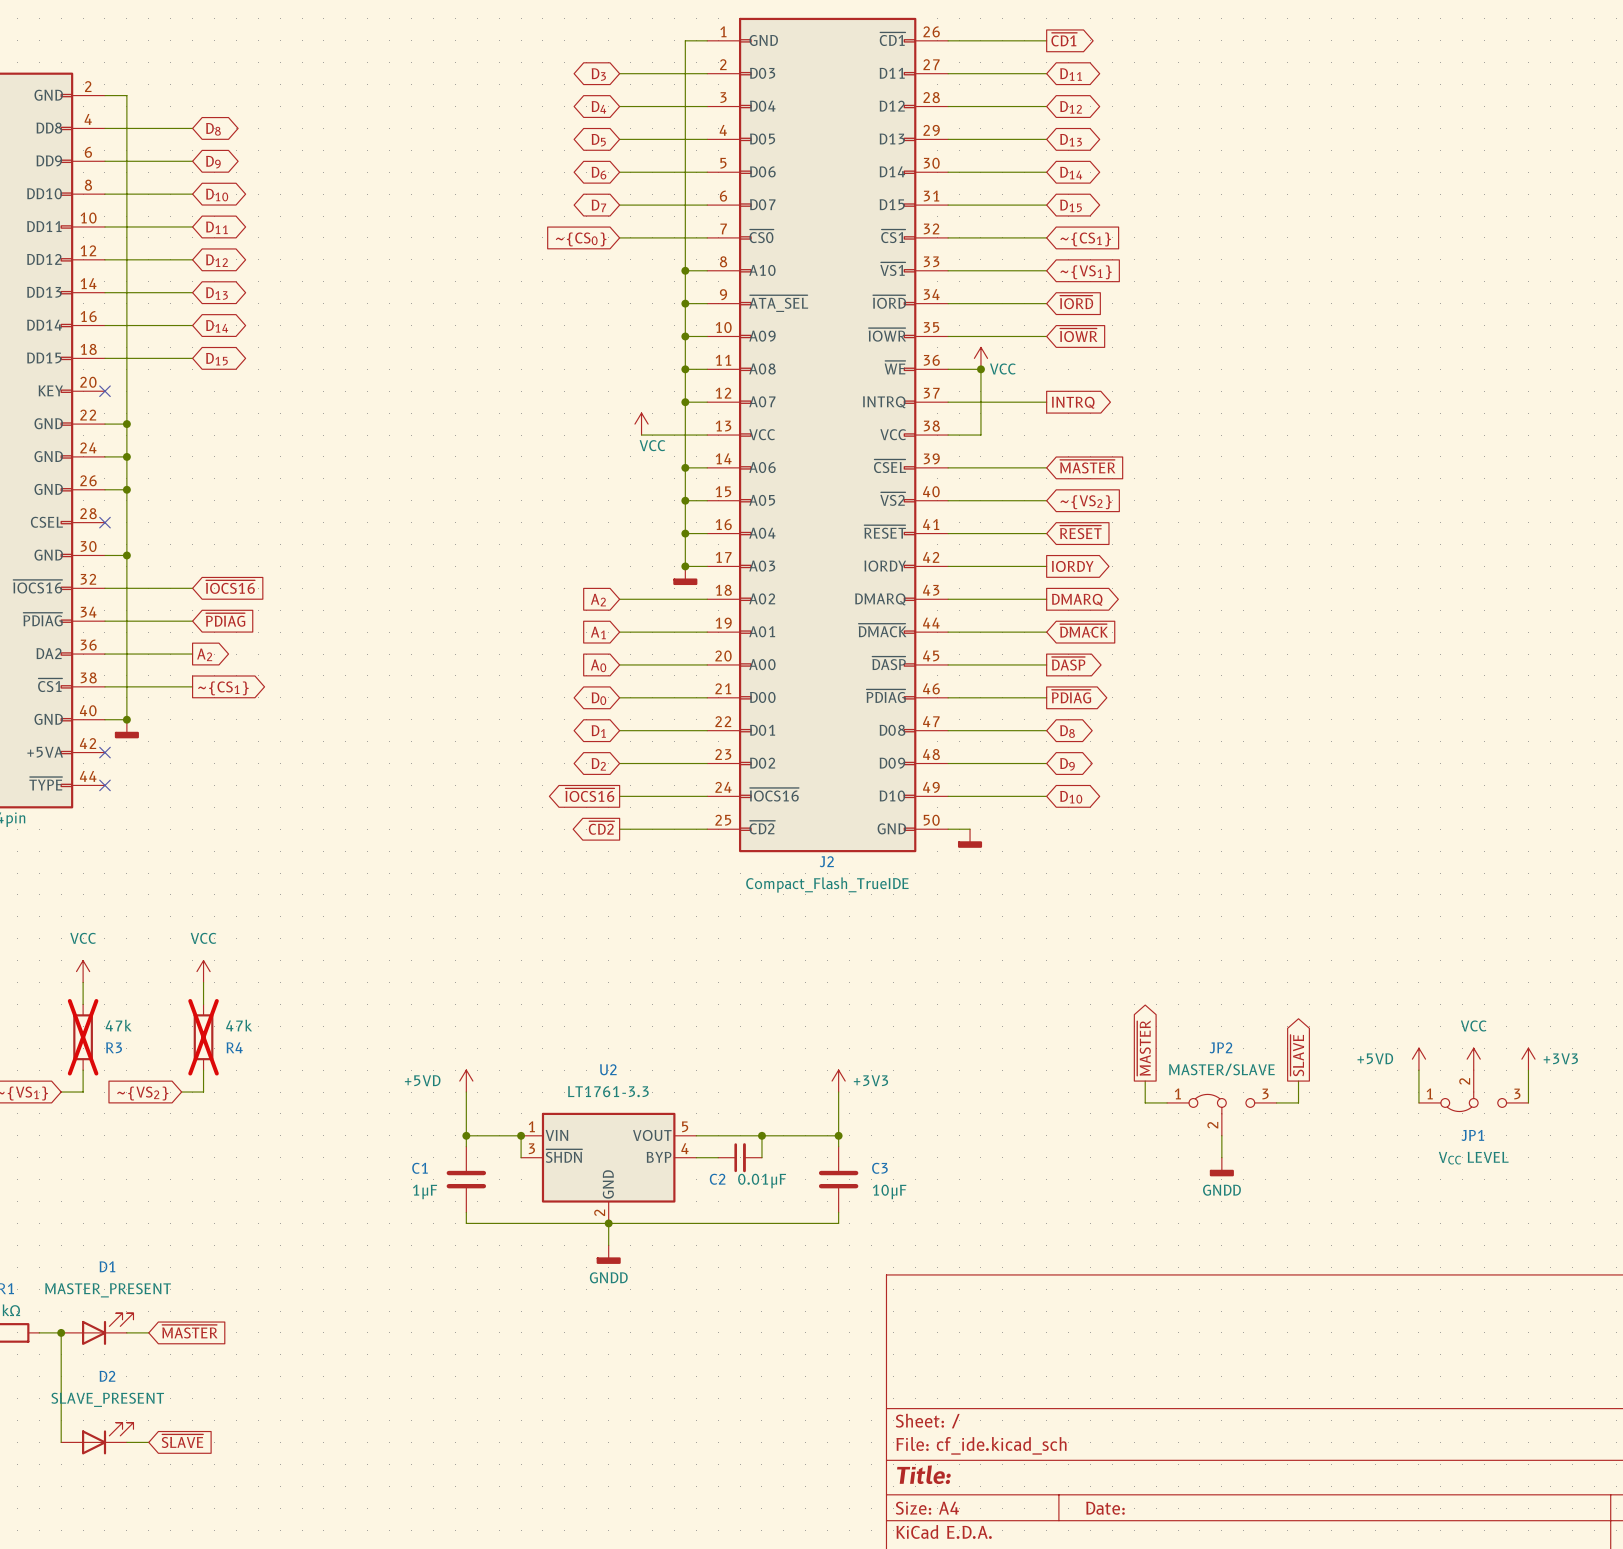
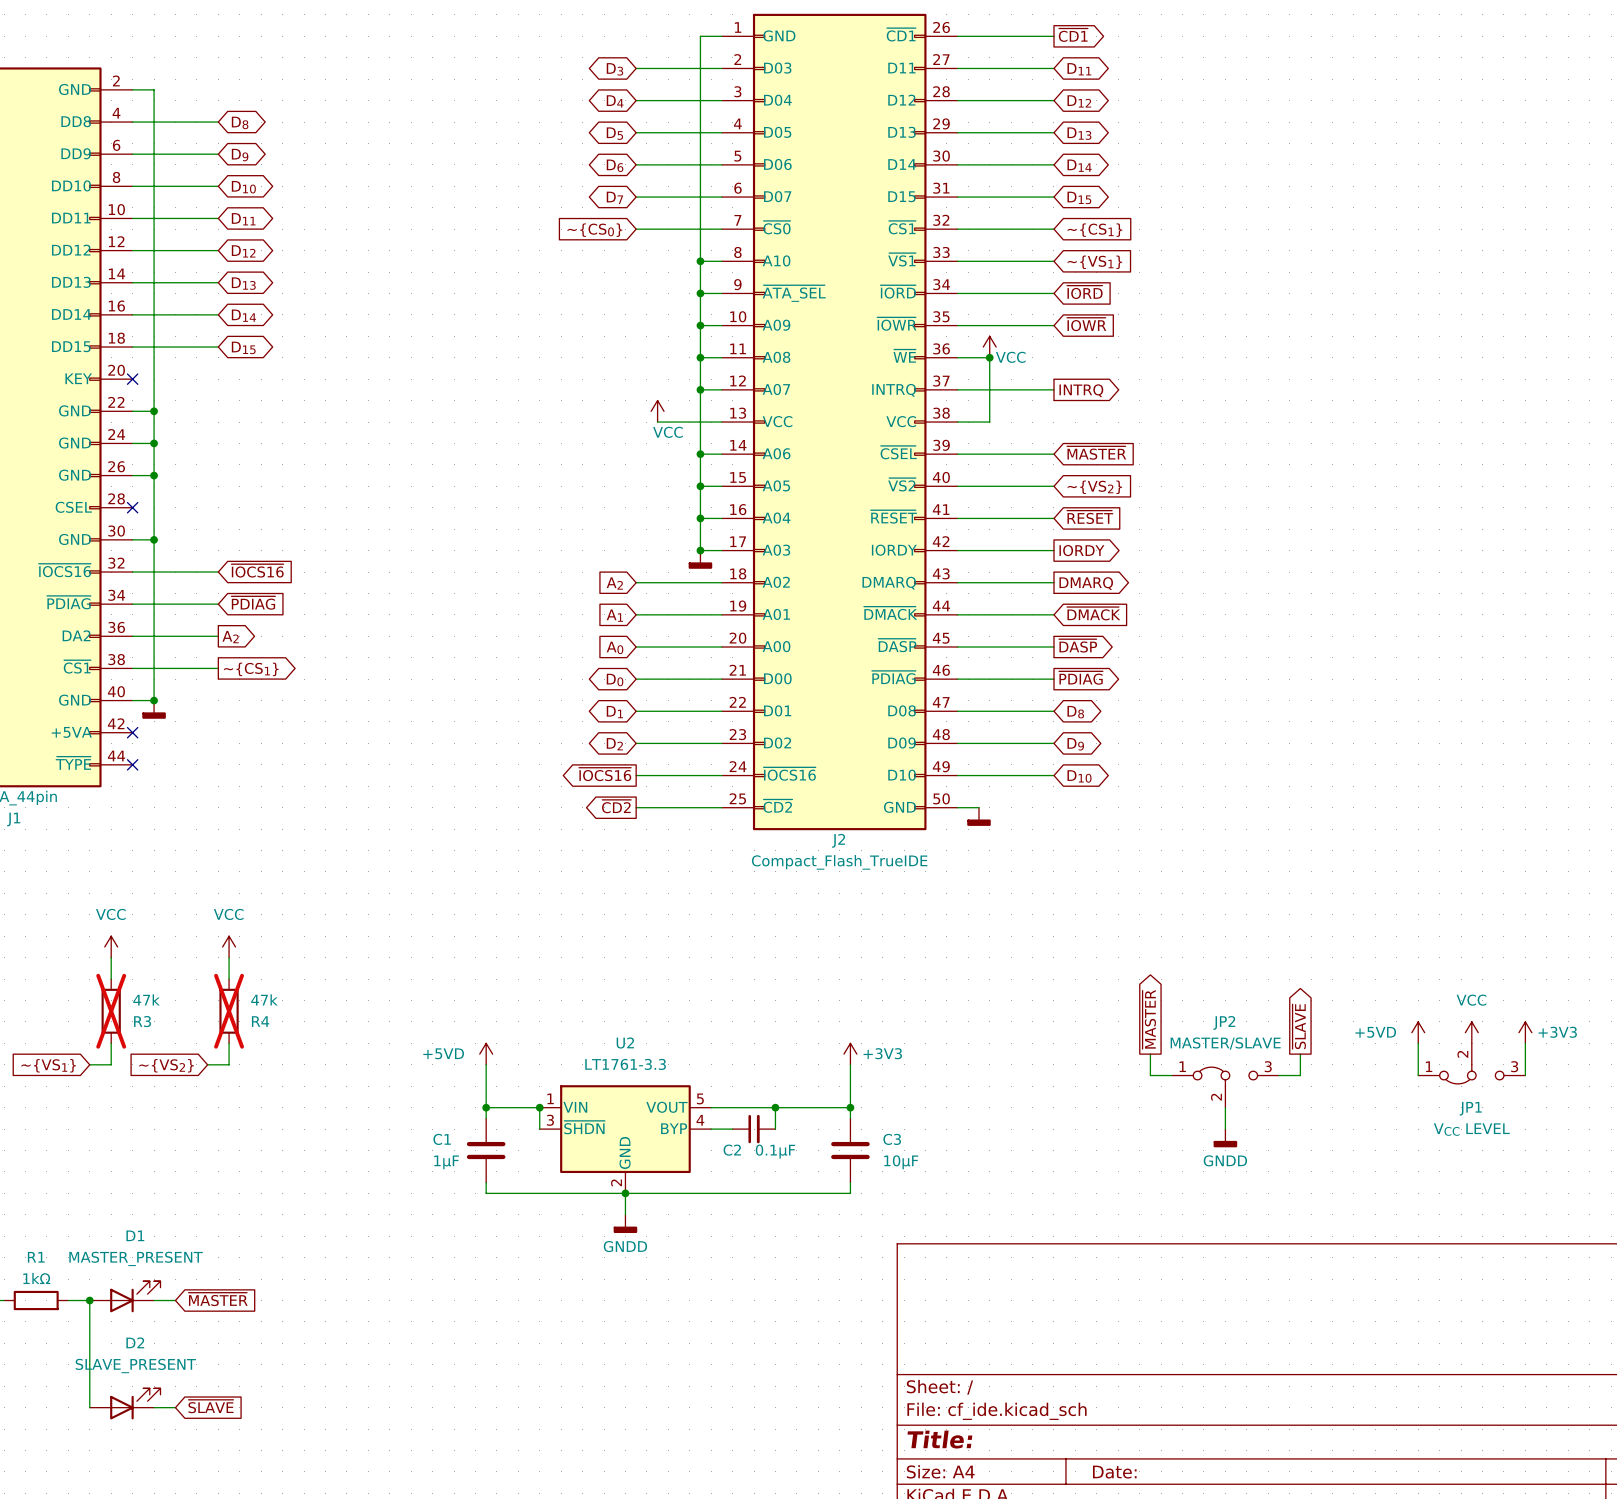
C2 value: 0.01μF (762, 1181) -> 0.1μF (775, 1151)

